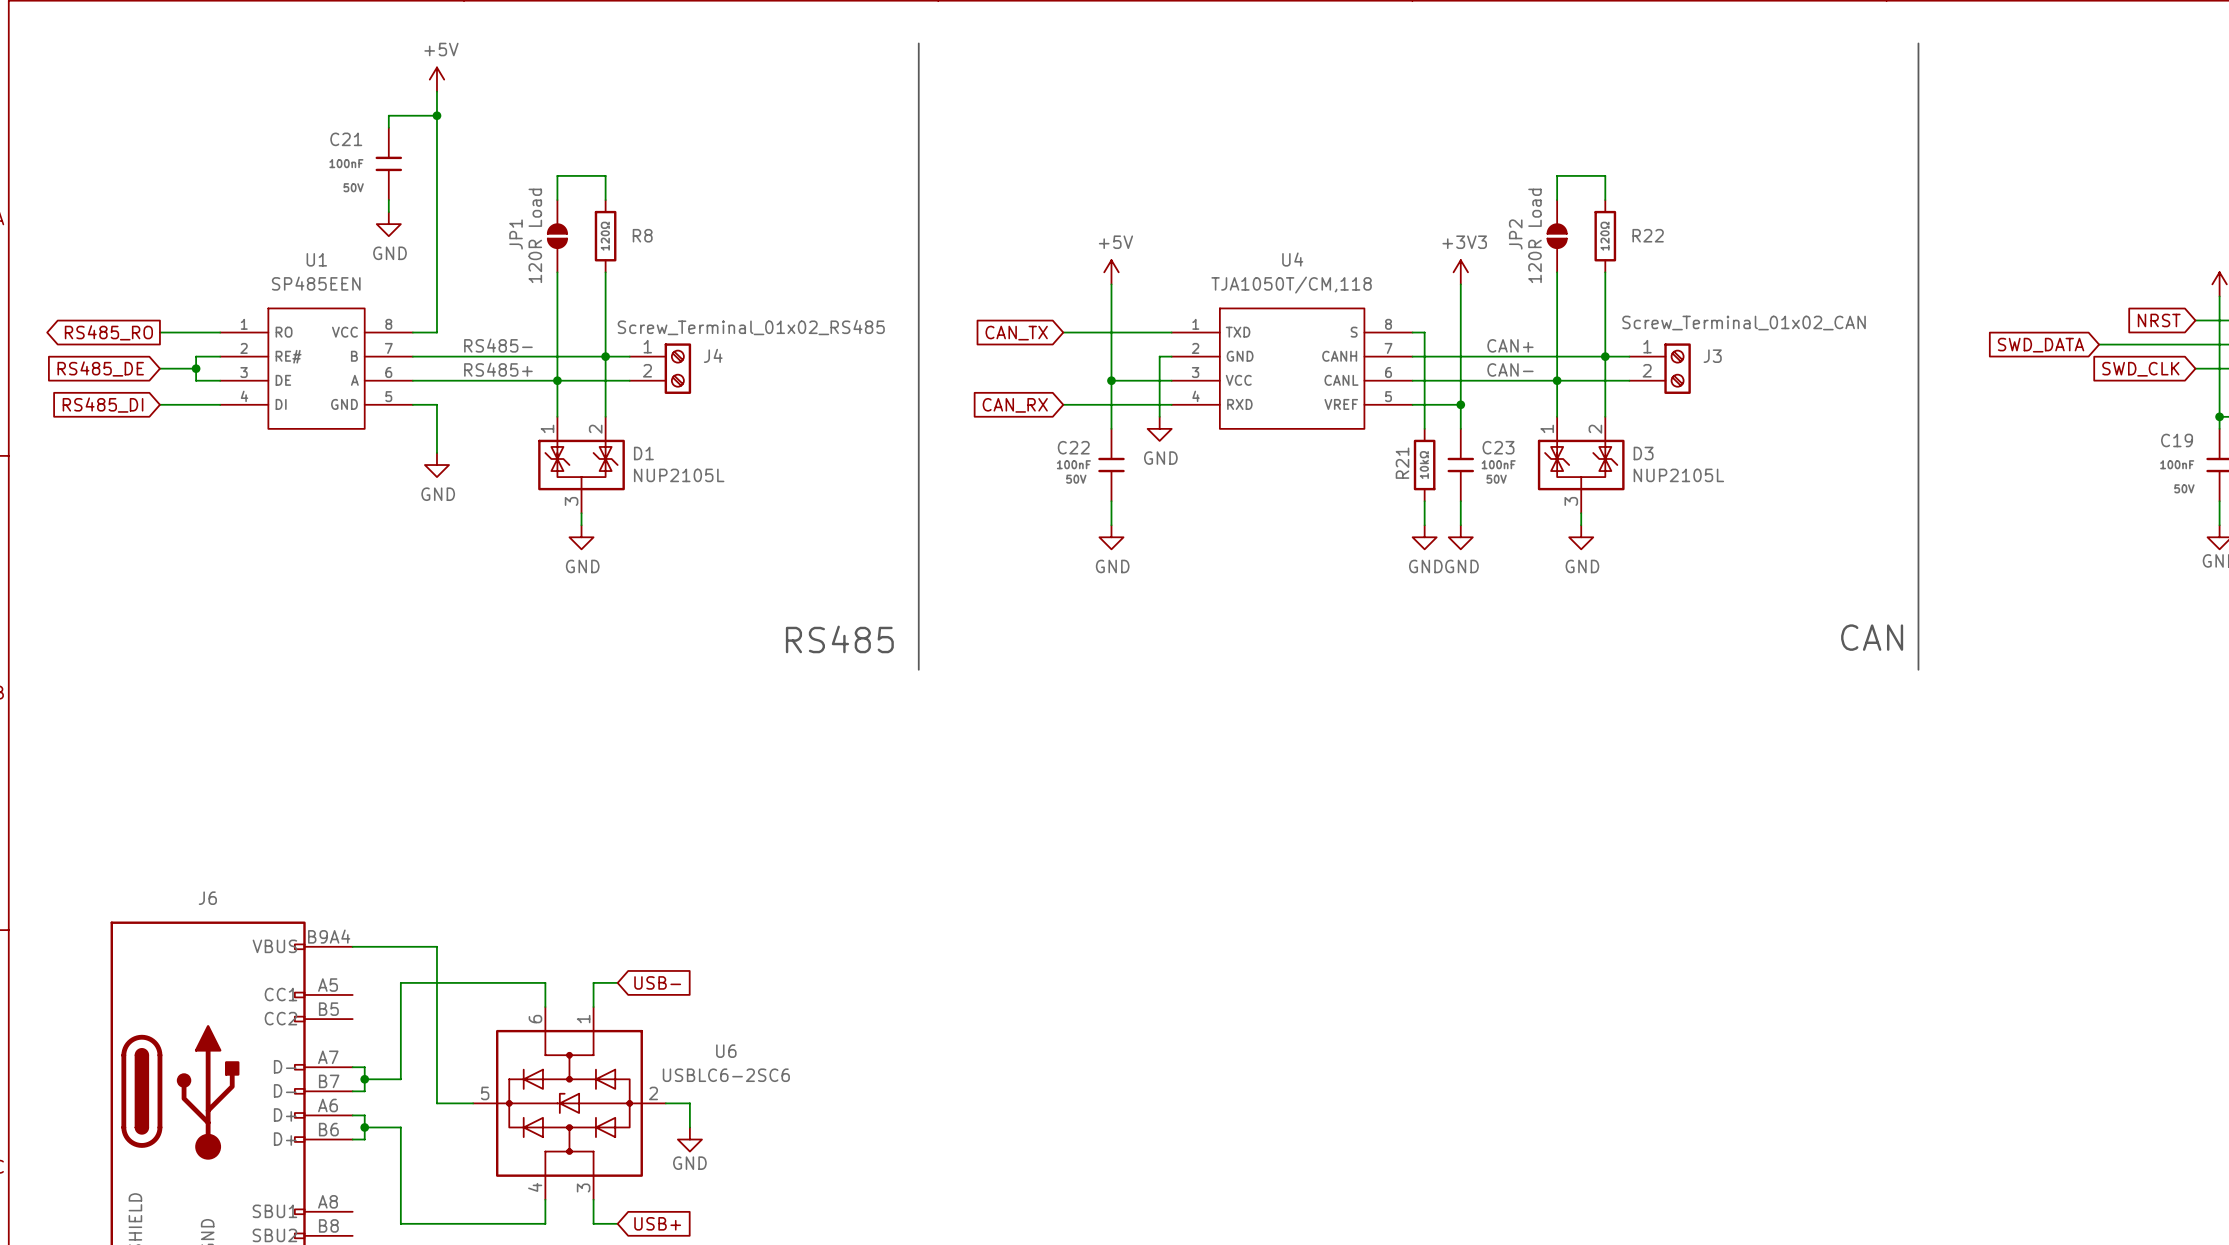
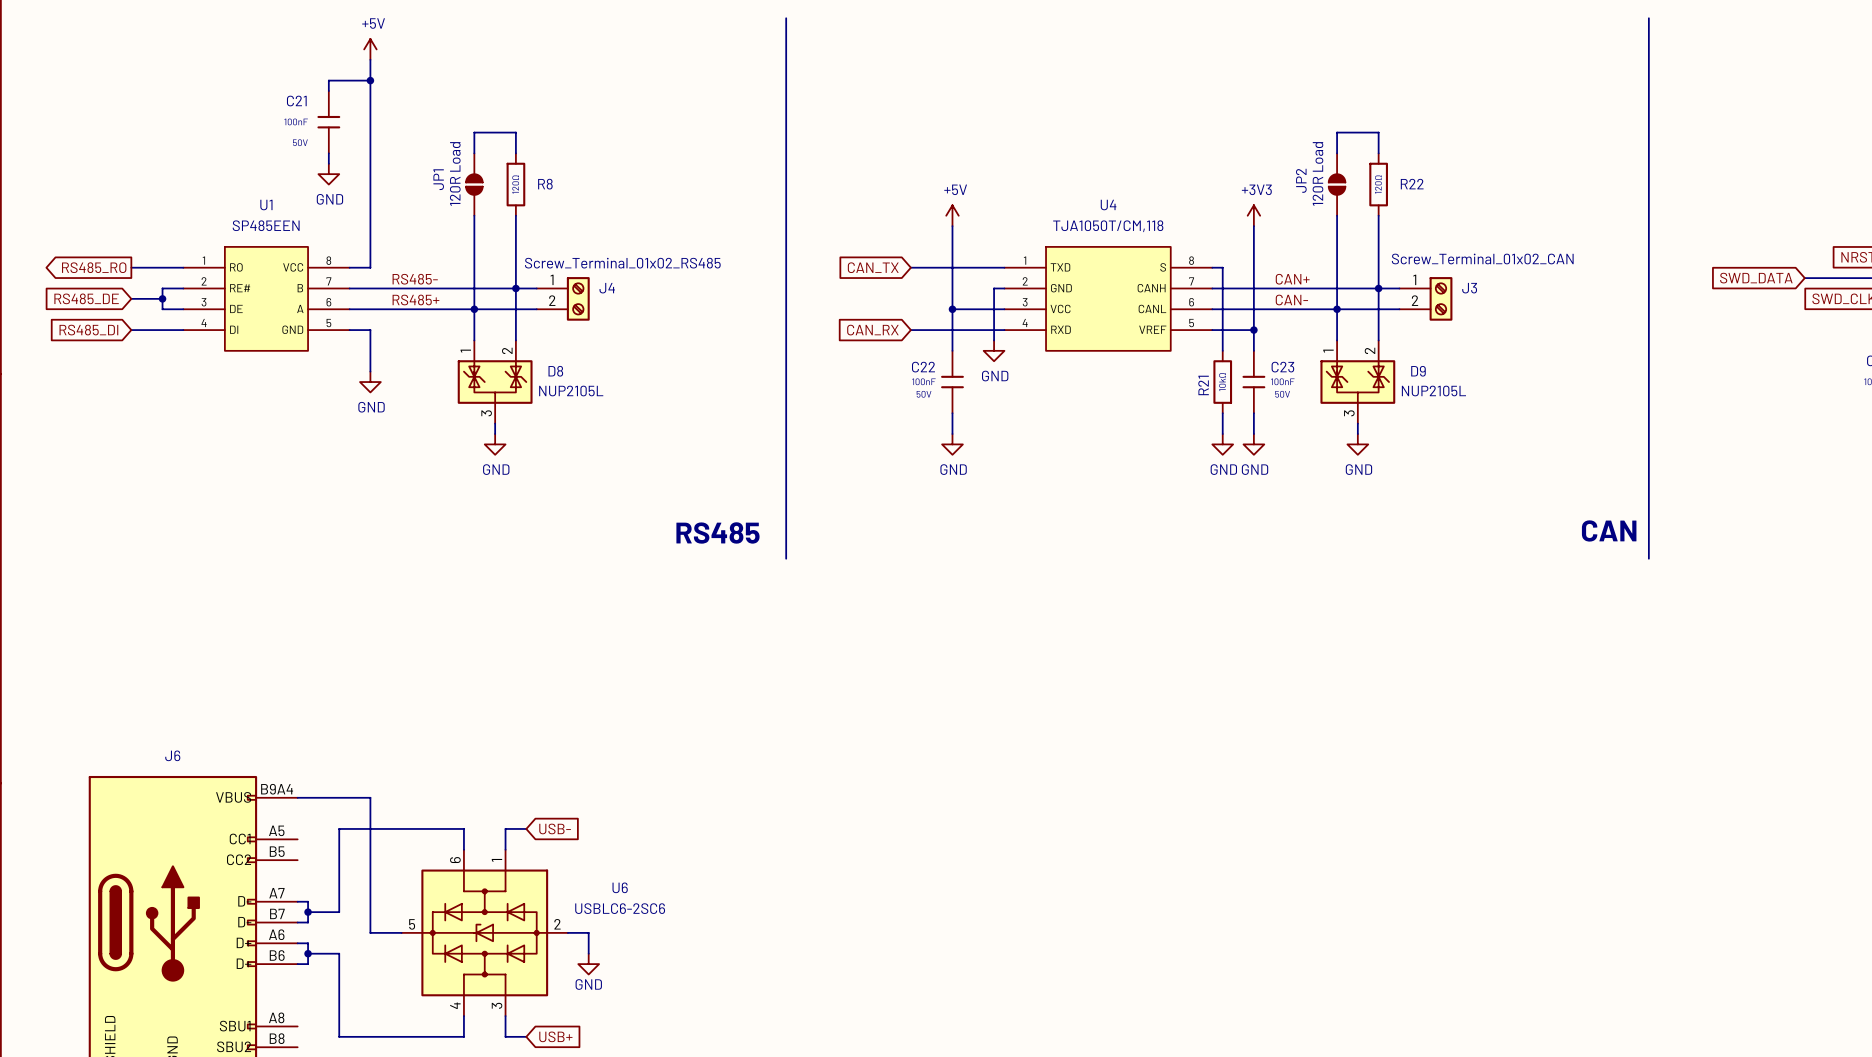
D1 name: D1 (643, 453) -> D8 (555, 371)
D3 name: D3 (1643, 453) -> D9 (1418, 371)

